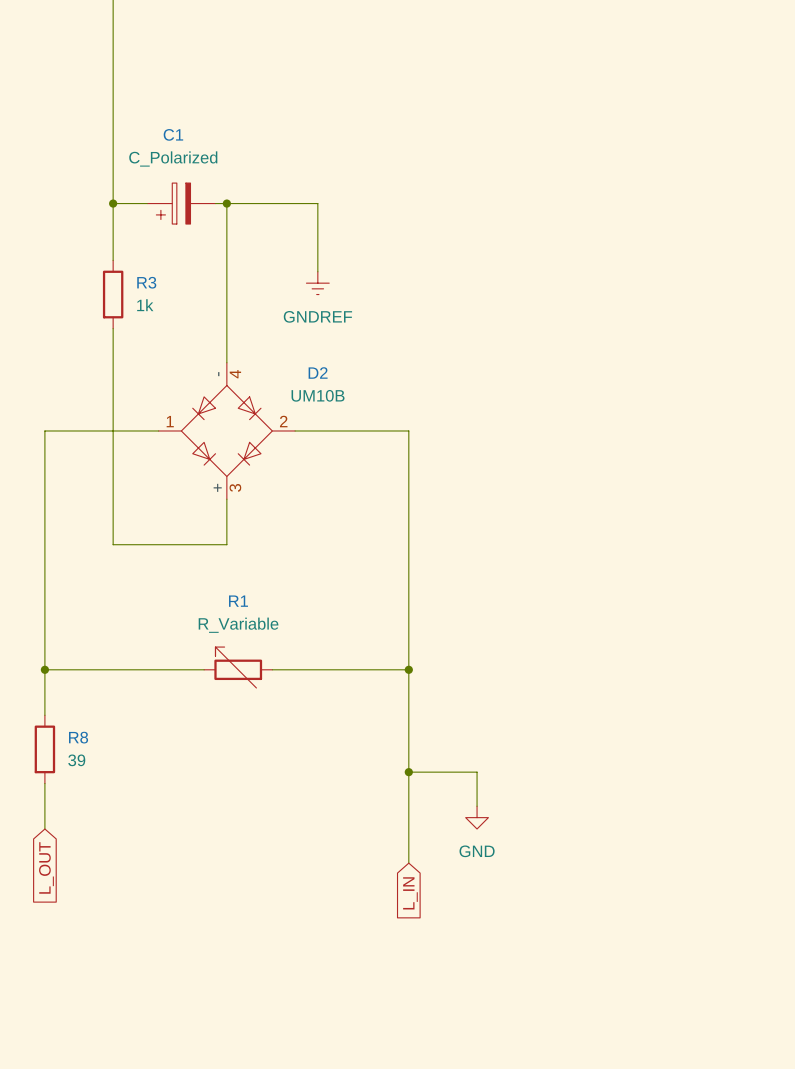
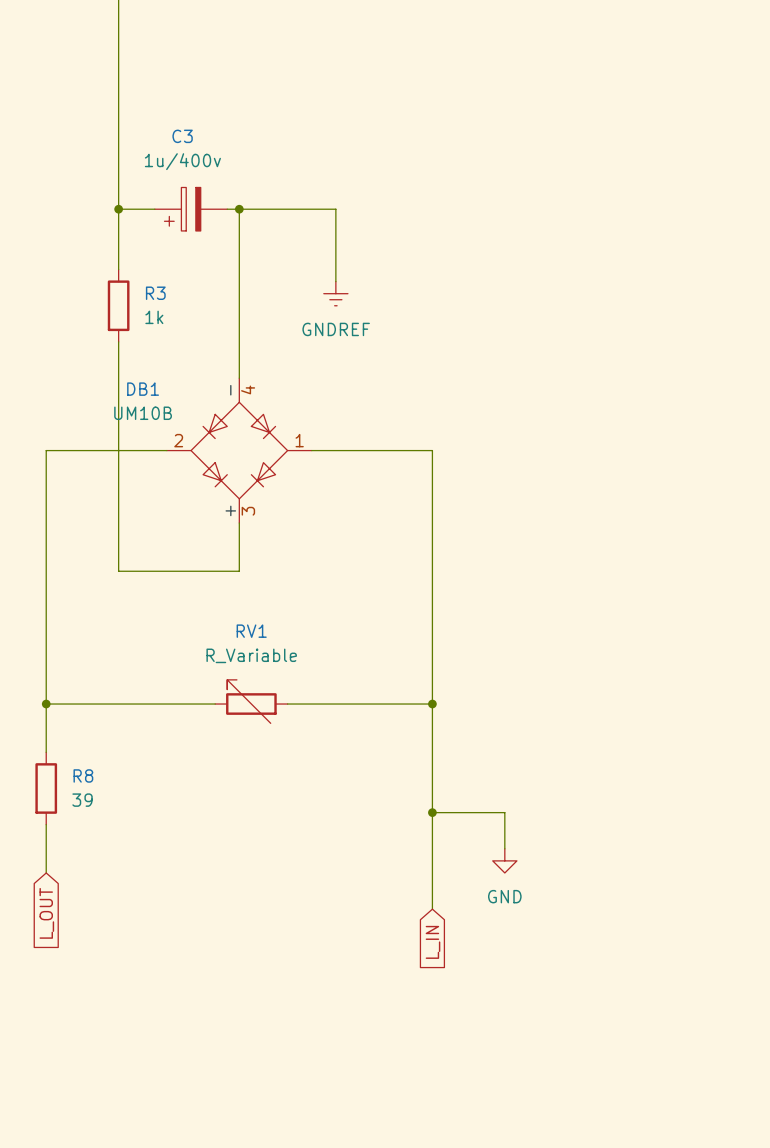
C1 name: C1 (173, 134) -> C3 (182, 136)
C1 value: C_Polarized (173, 158) -> 1u/400v (182, 161)
D2 name: D2 (318, 372) -> DB1 (143, 389)
D2 flip: as is (226, 430) -> left-right (239, 450)
R1 name: R1 (238, 601) -> RV1 (251, 631)

